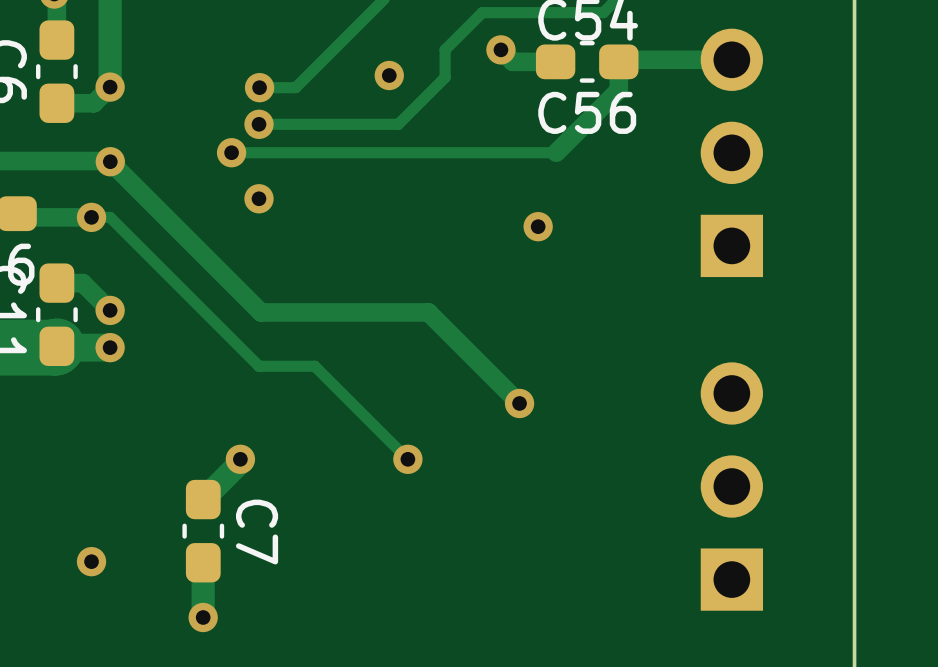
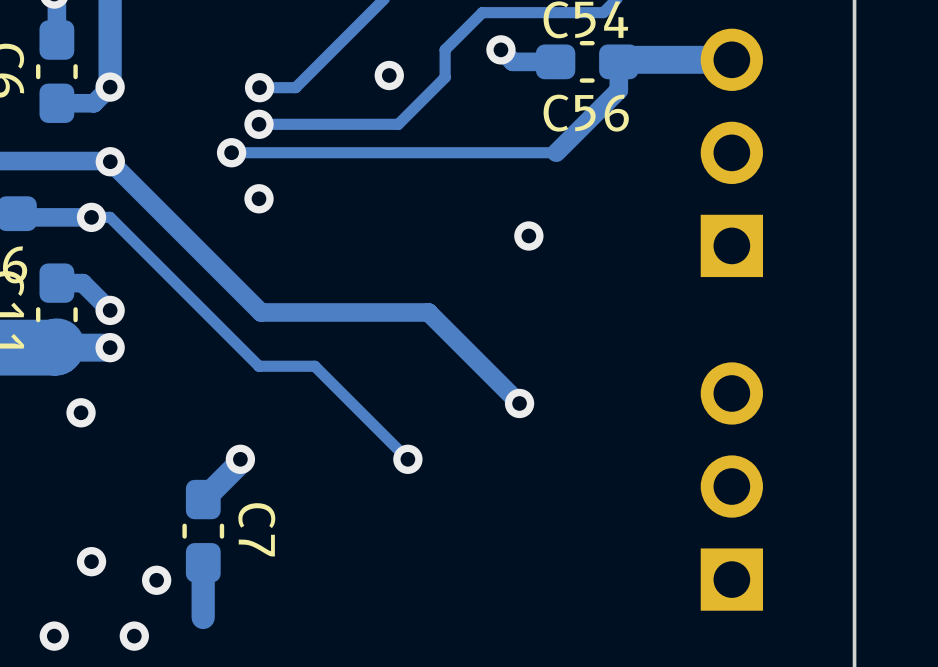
track width: thin (731, 59) (620, 59) -> thick (731, 59) (620, 59)
via position: (538, 226) -> (528, 235)
via: none -> (81, 412)
via: none -> (156, 580)
via: (203, 617) -> none
via: none -> (54, 636)
via: none -> (134, 636)

